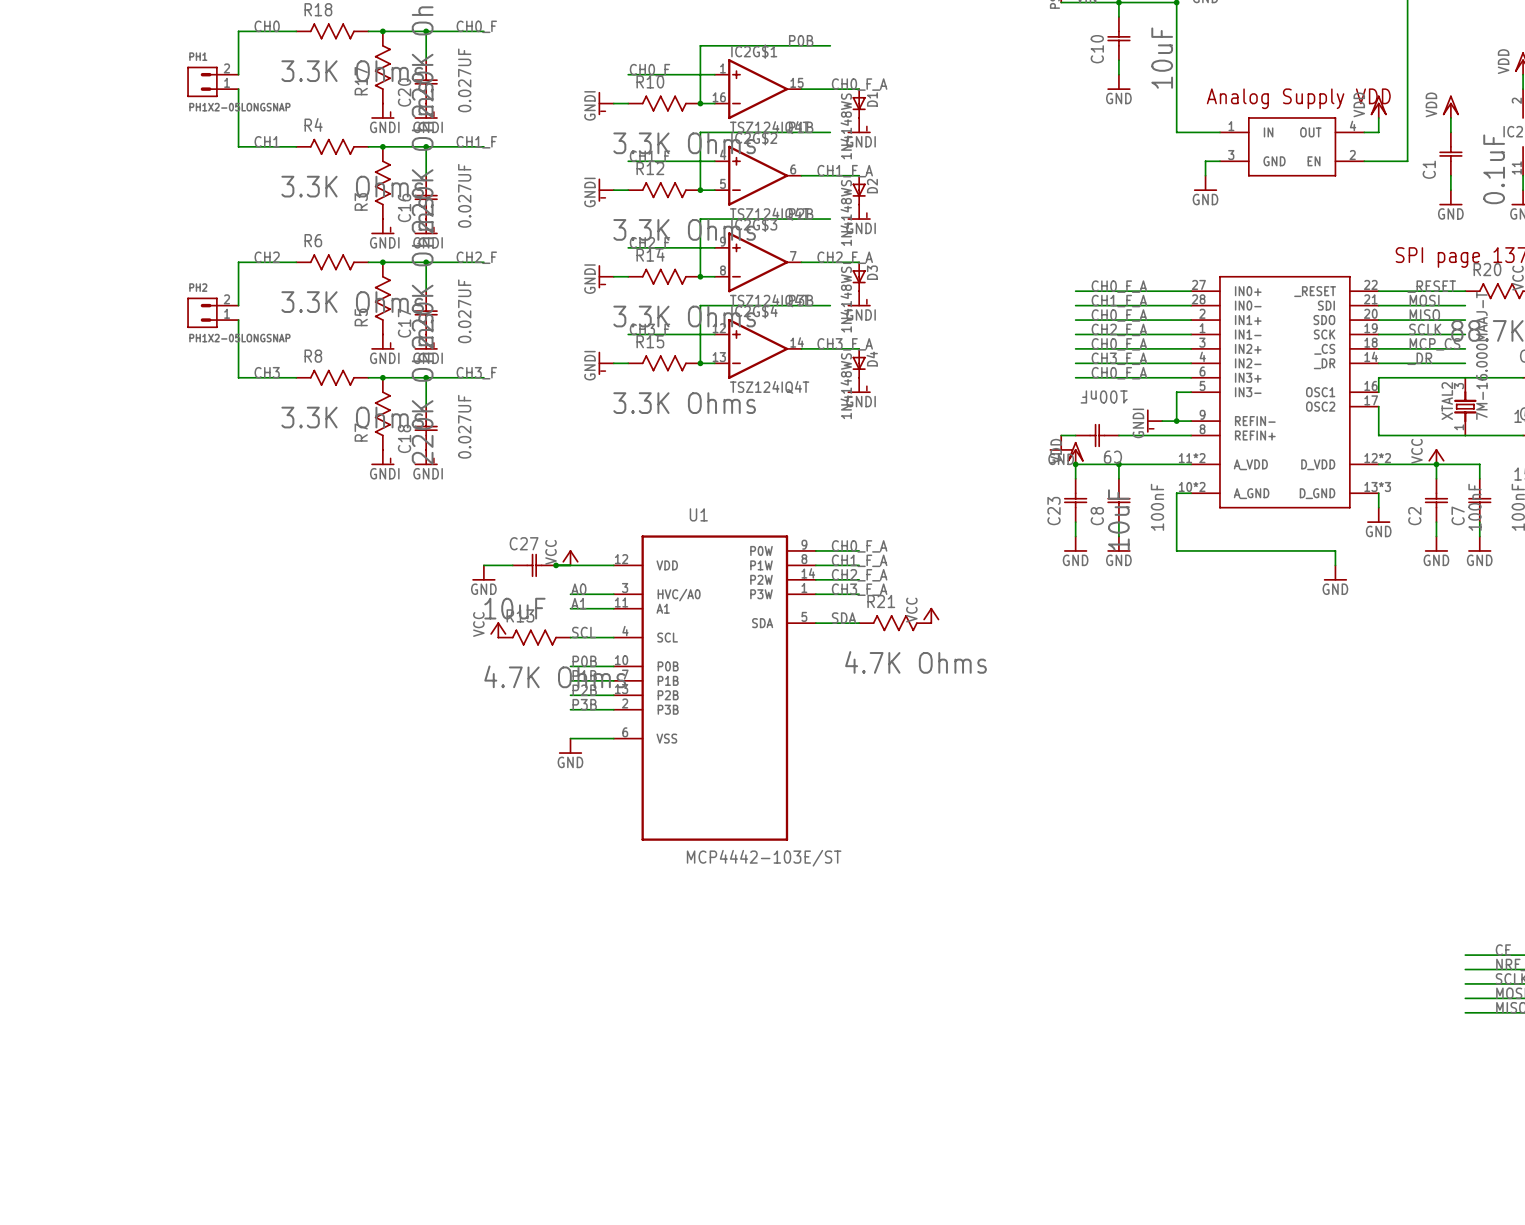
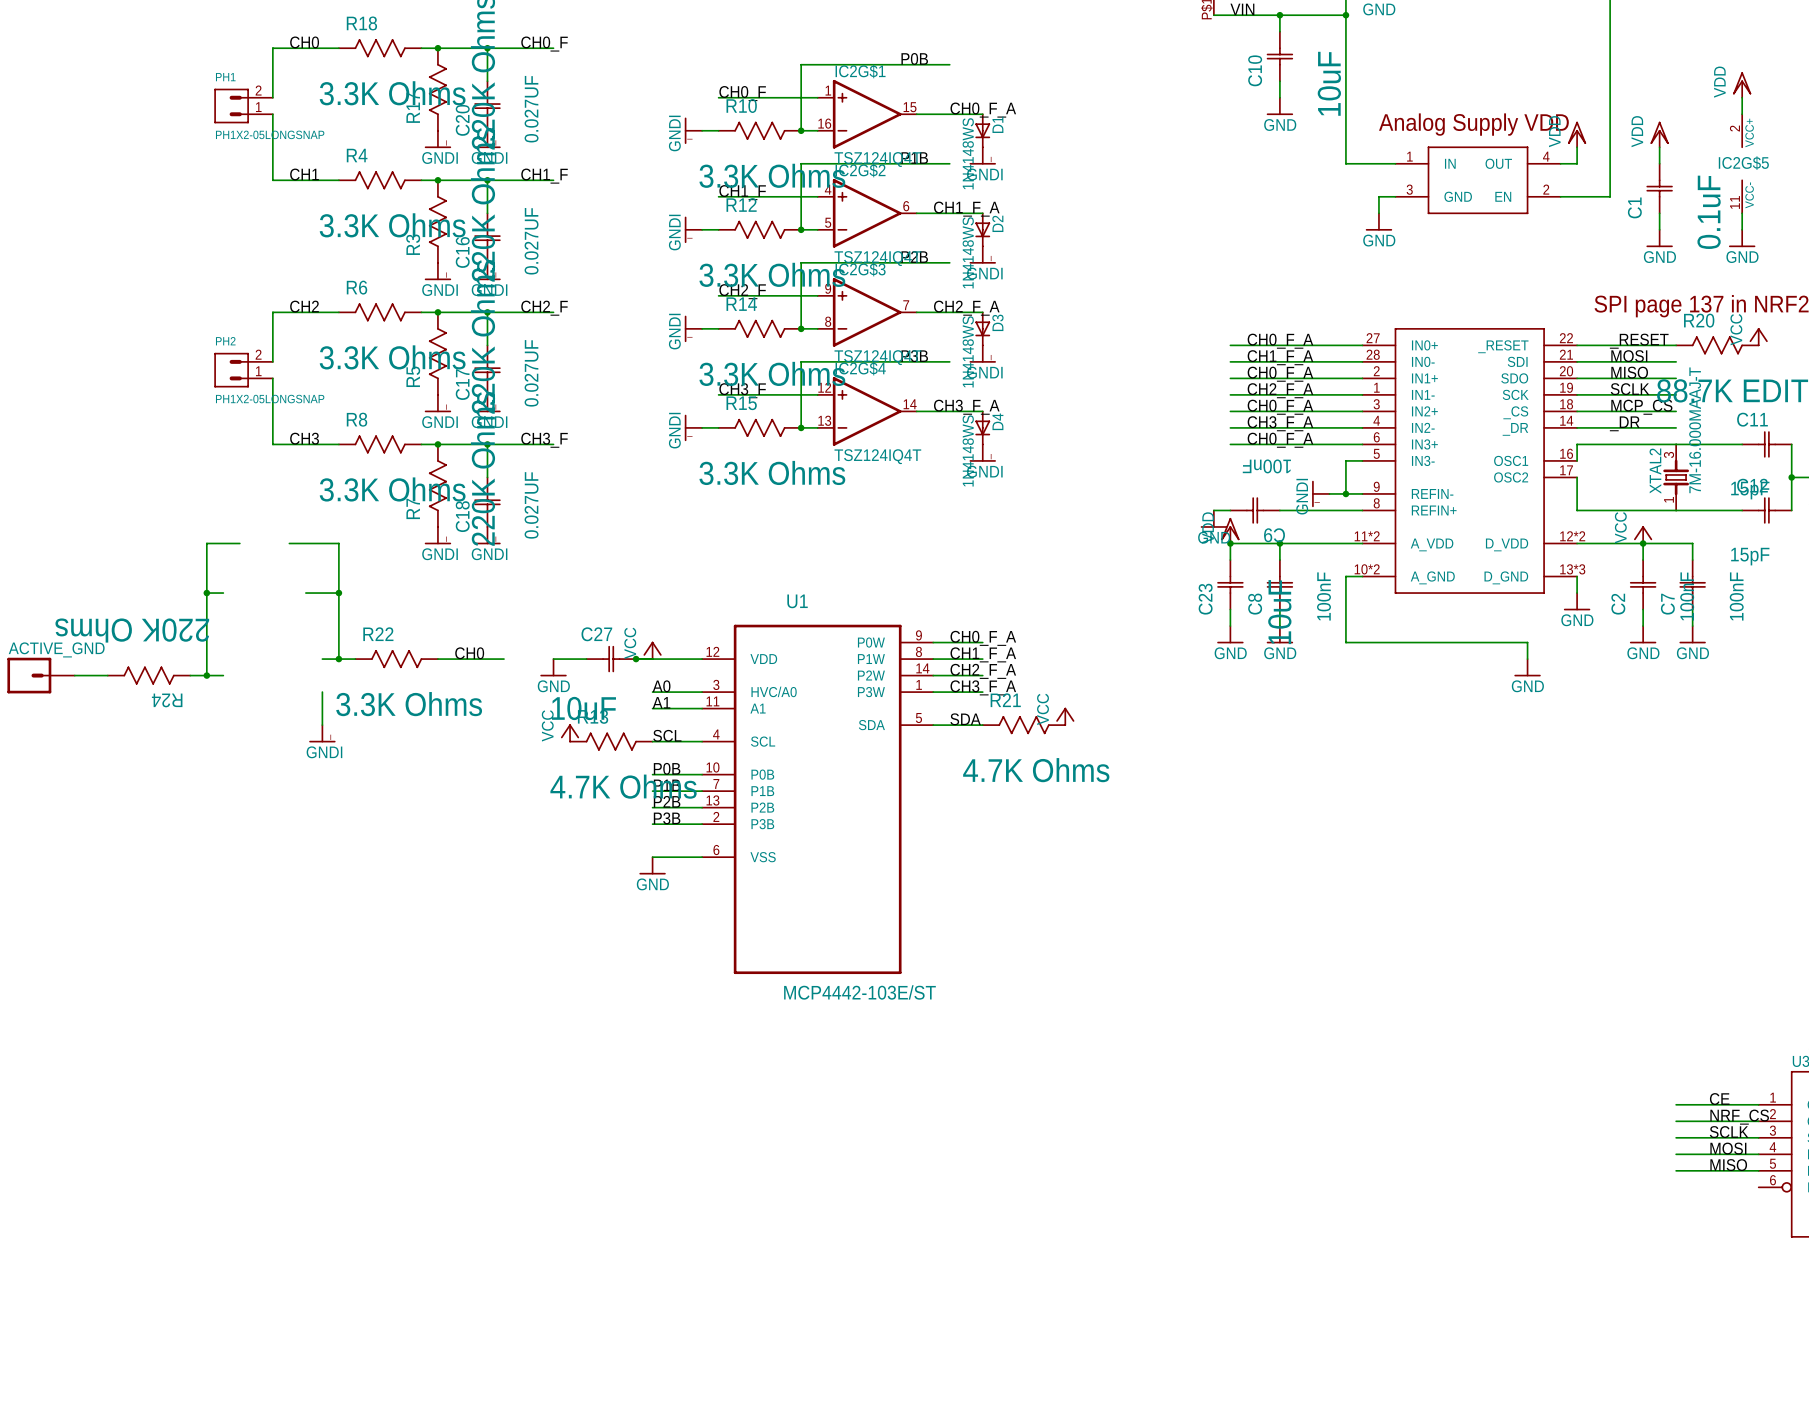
wire: none -> (239, 543) (206, 543) (206, 675)
wire: none -> (289, 543) (338, 543) (338, 659)
wire: none -> (206, 593) (223, 593)
junction: none -> (206, 593)
wire: none -> (305, 593) (338, 593)
junction: none -> (338, 593)
label: none -> CH0 (469, 653)
wire: none -> (322, 659) (355, 659)
junction: none -> (338, 659)
R22: none -> 3.3K Ohms (396, 659)
wire: none -> (437, 659) (503, 659)
ACTIVE_GND: none -> (41, 675)
wire: none -> (74, 675) (107, 675)
R24: none -> 220K Ohms (149, 675)
wire: none -> (190, 675) (223, 675)
junction: none -> (206, 675)
wire: none -> (322, 692) (322, 725)
power symbol: none -> GNDI (322, 733)

